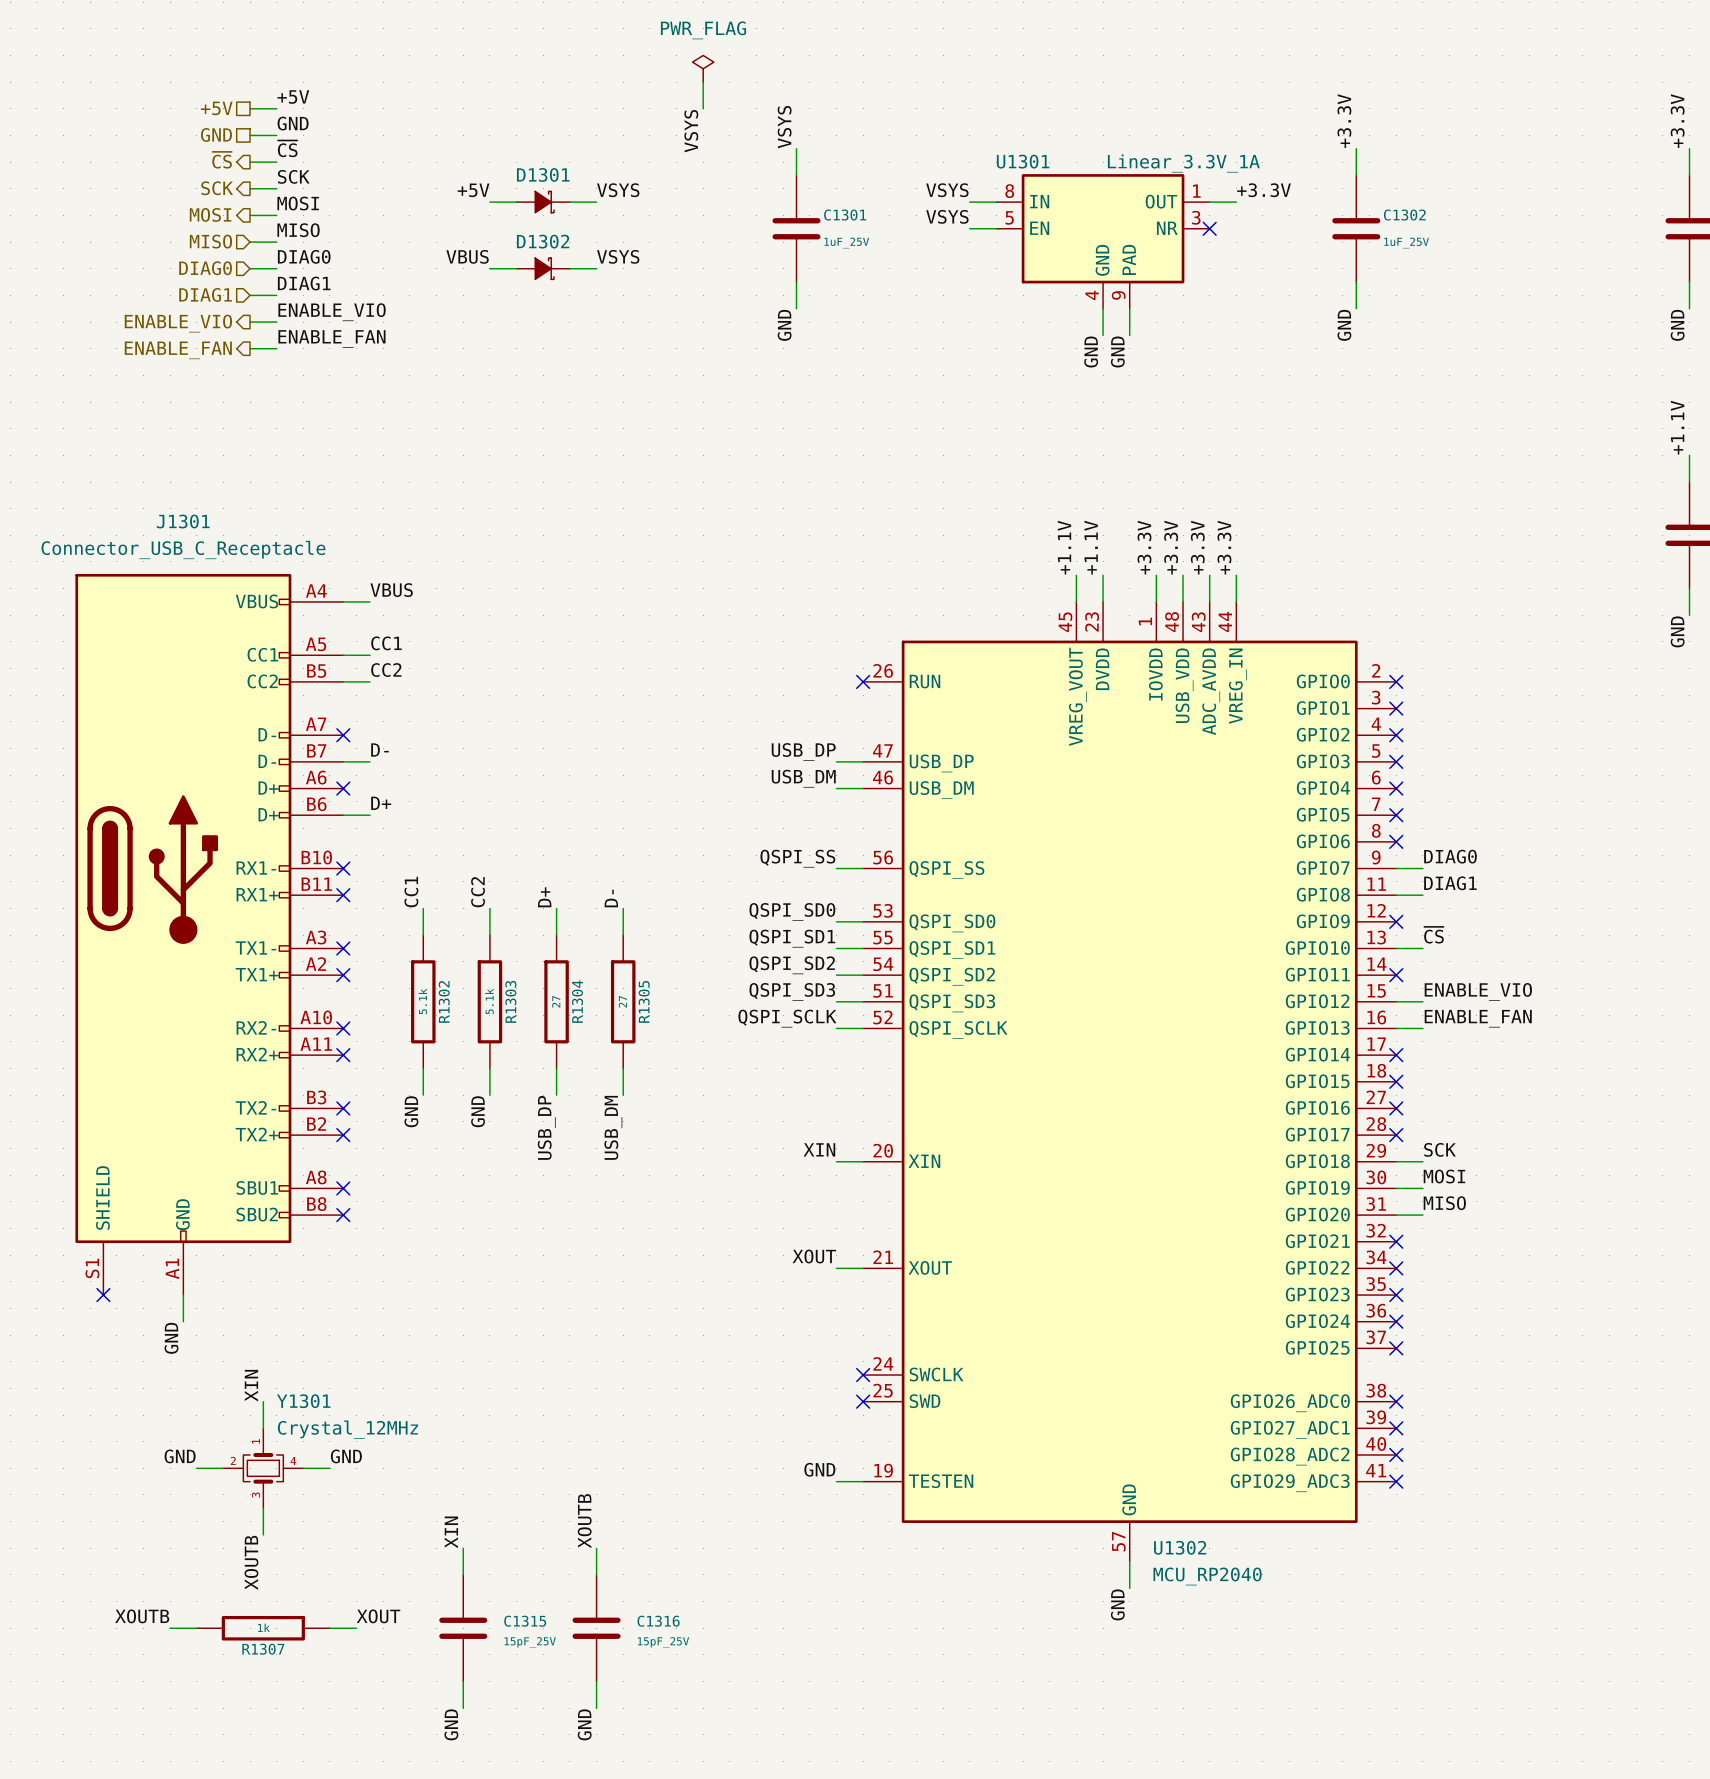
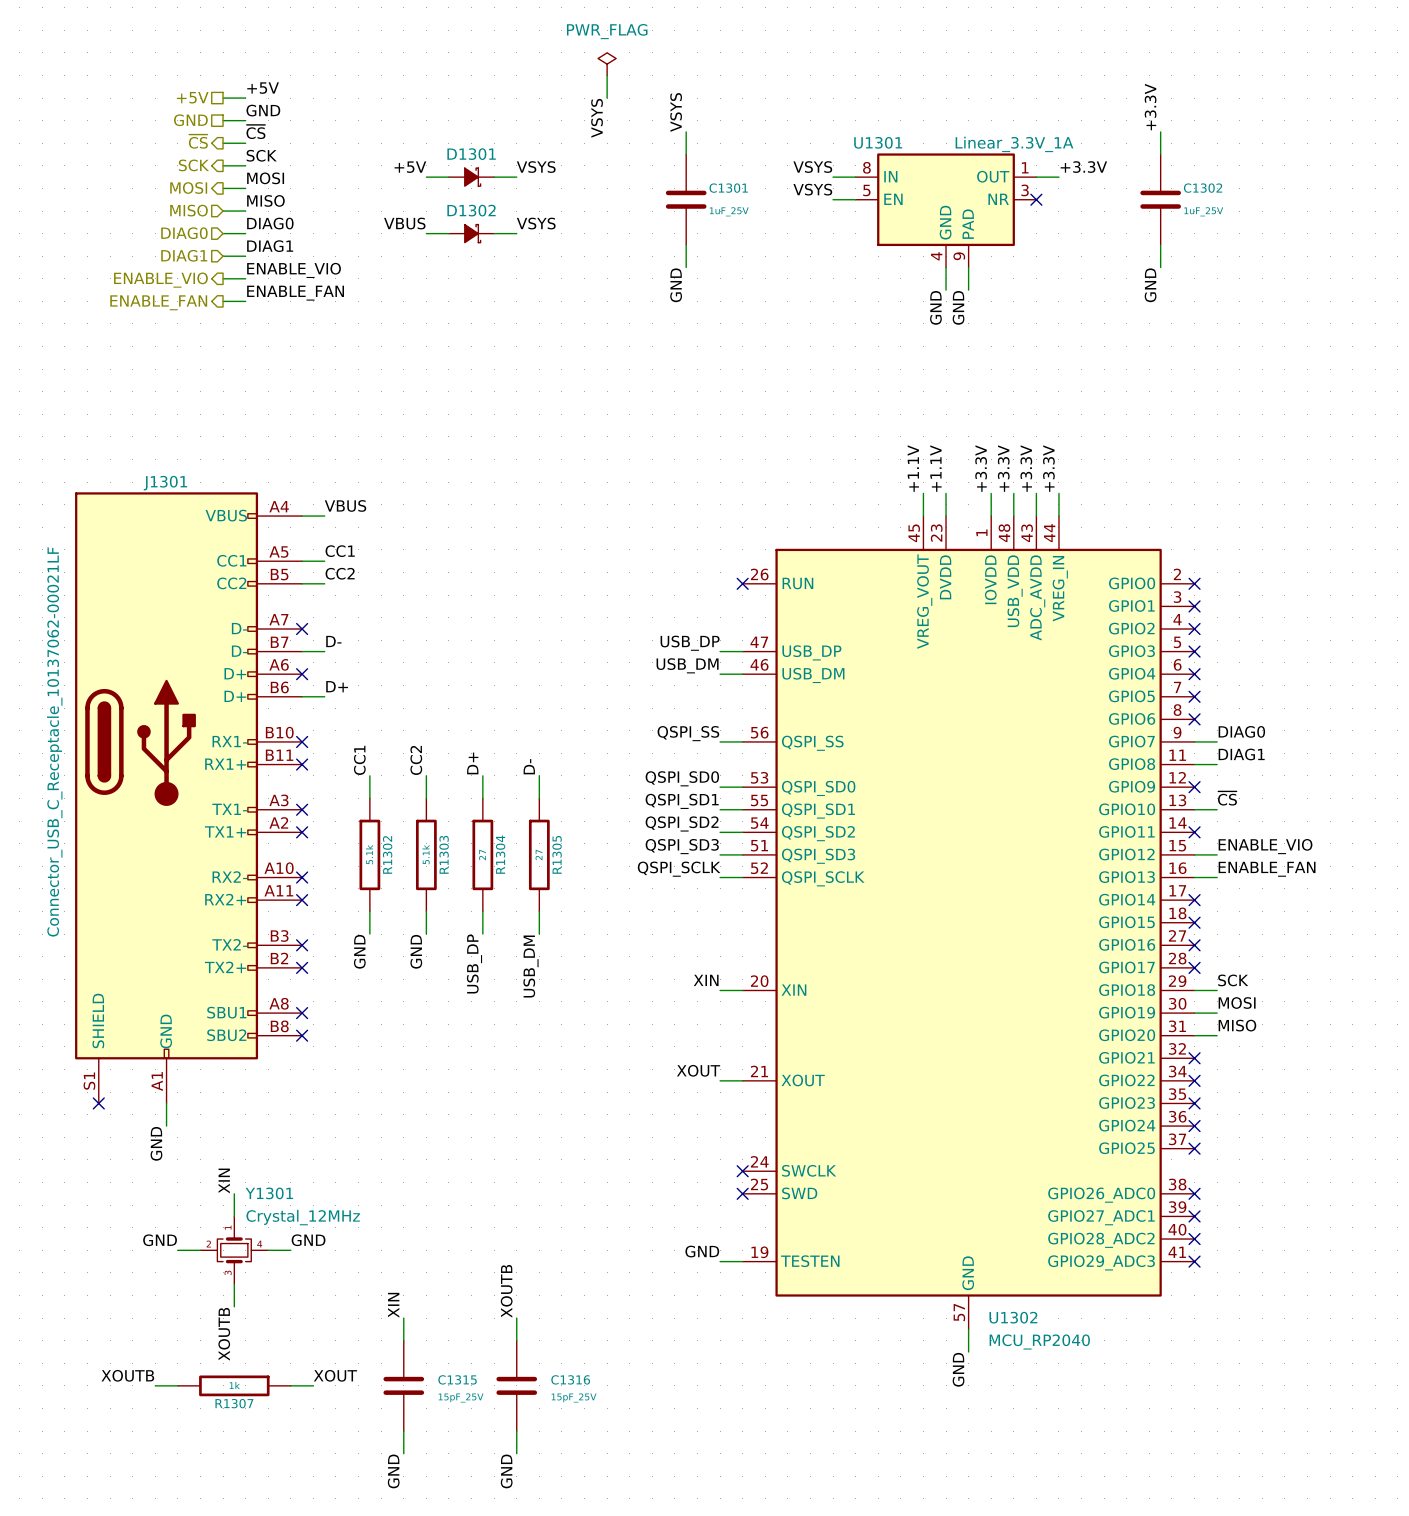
J1301 name position: J1301 (183, 521) -> J1301 (165, 483)
J1301 value: Connector_USB_C_Receptacle (183, 549) -> Connector_USB_C_Receptacle_10137062-00021LF (54, 741)

